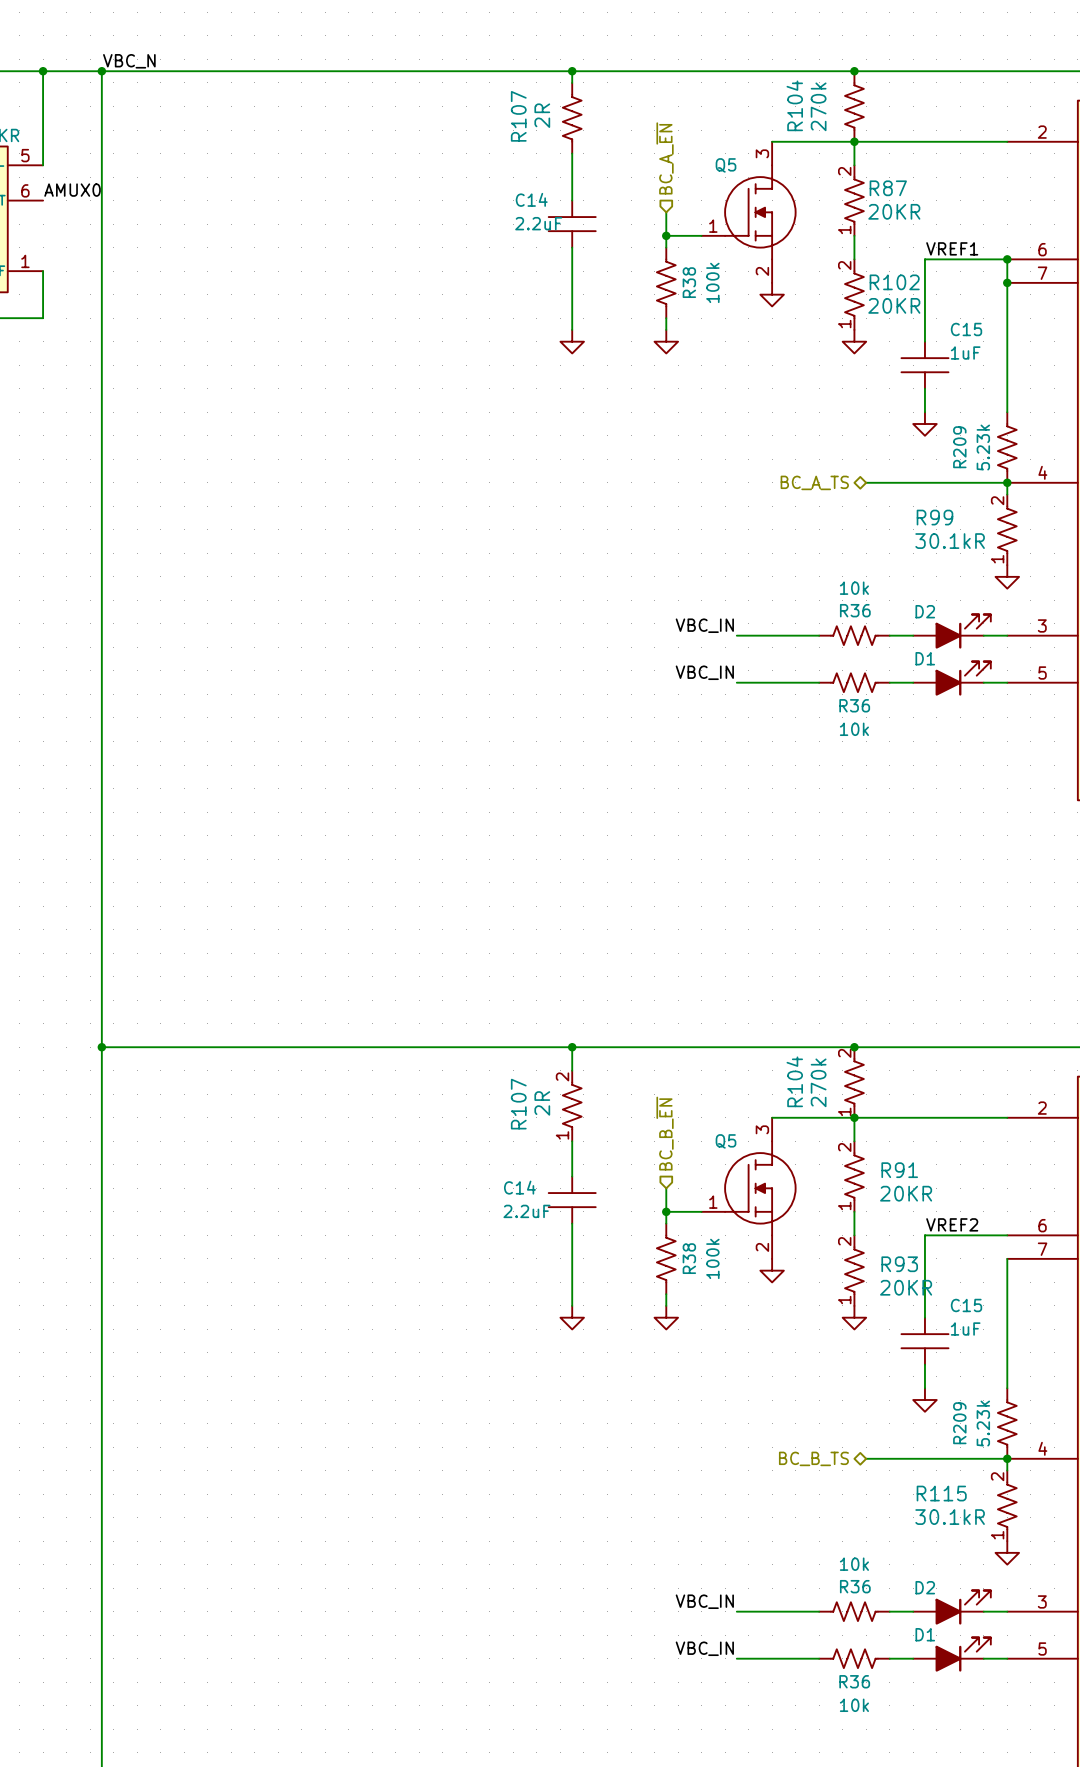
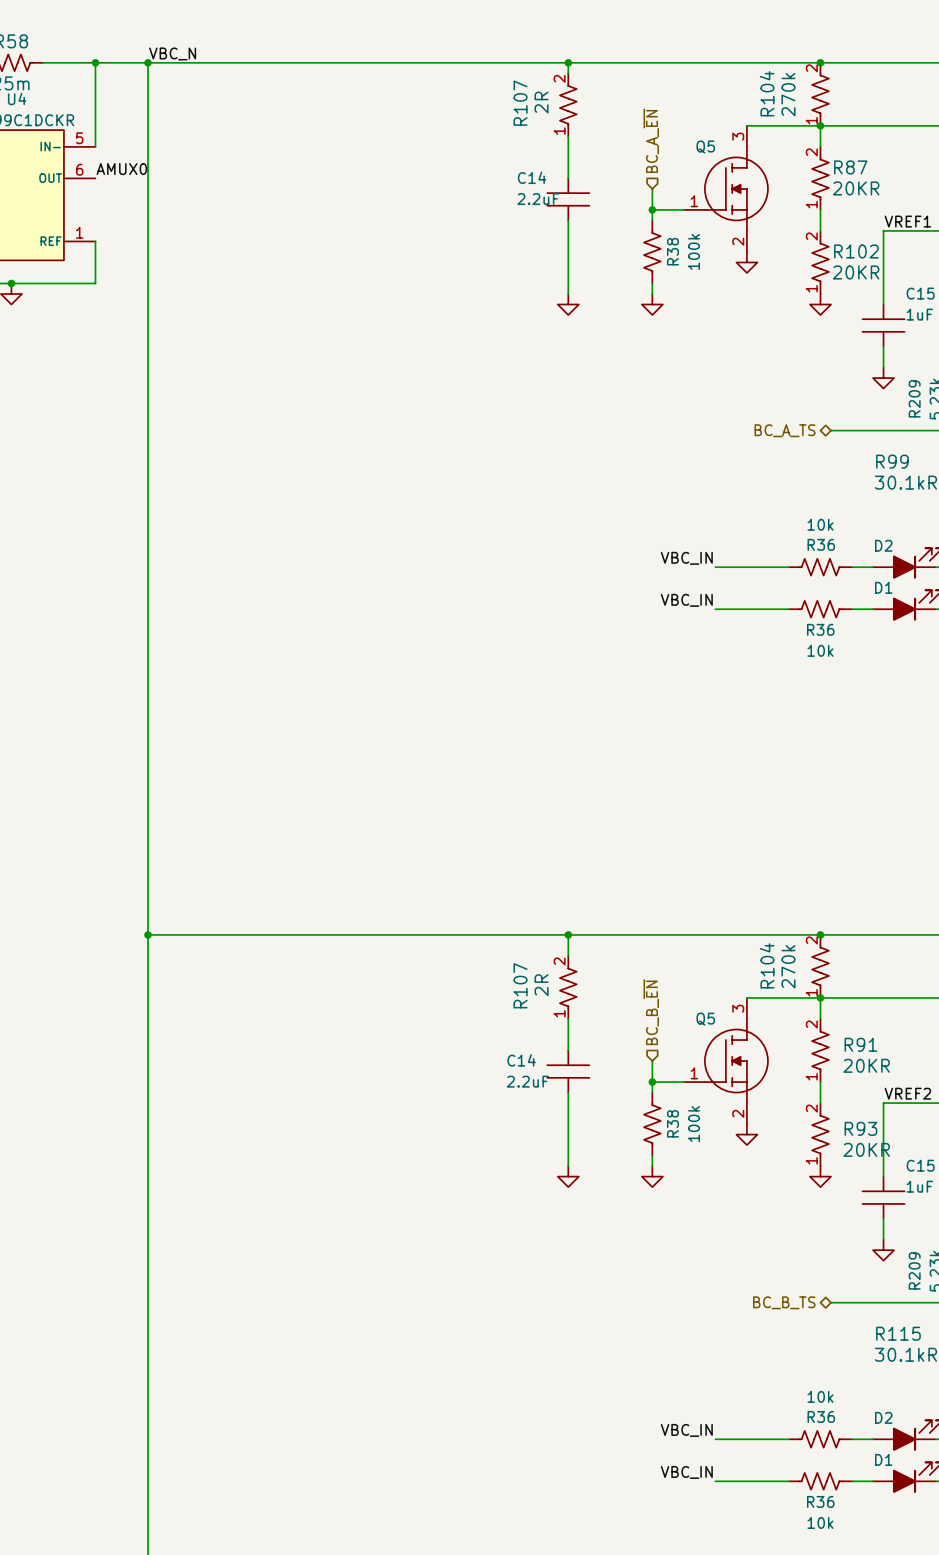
R104 pin number: none -> 2 (811, 68)
R107 pin number: none -> 2 (559, 78)
R104 pin number: none -> 1 (811, 120)
R107 pin number: none -> 1 (559, 131)

